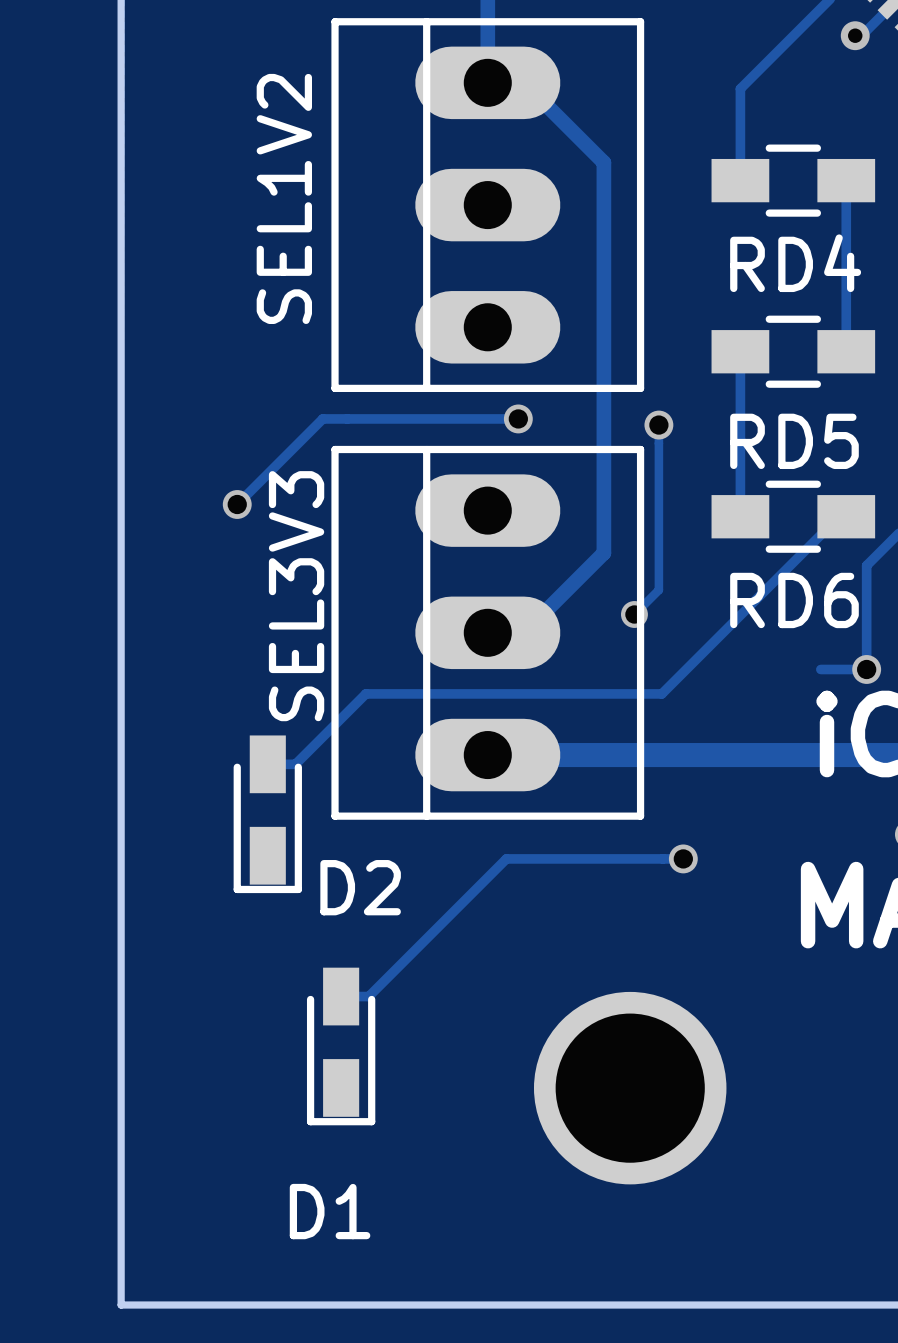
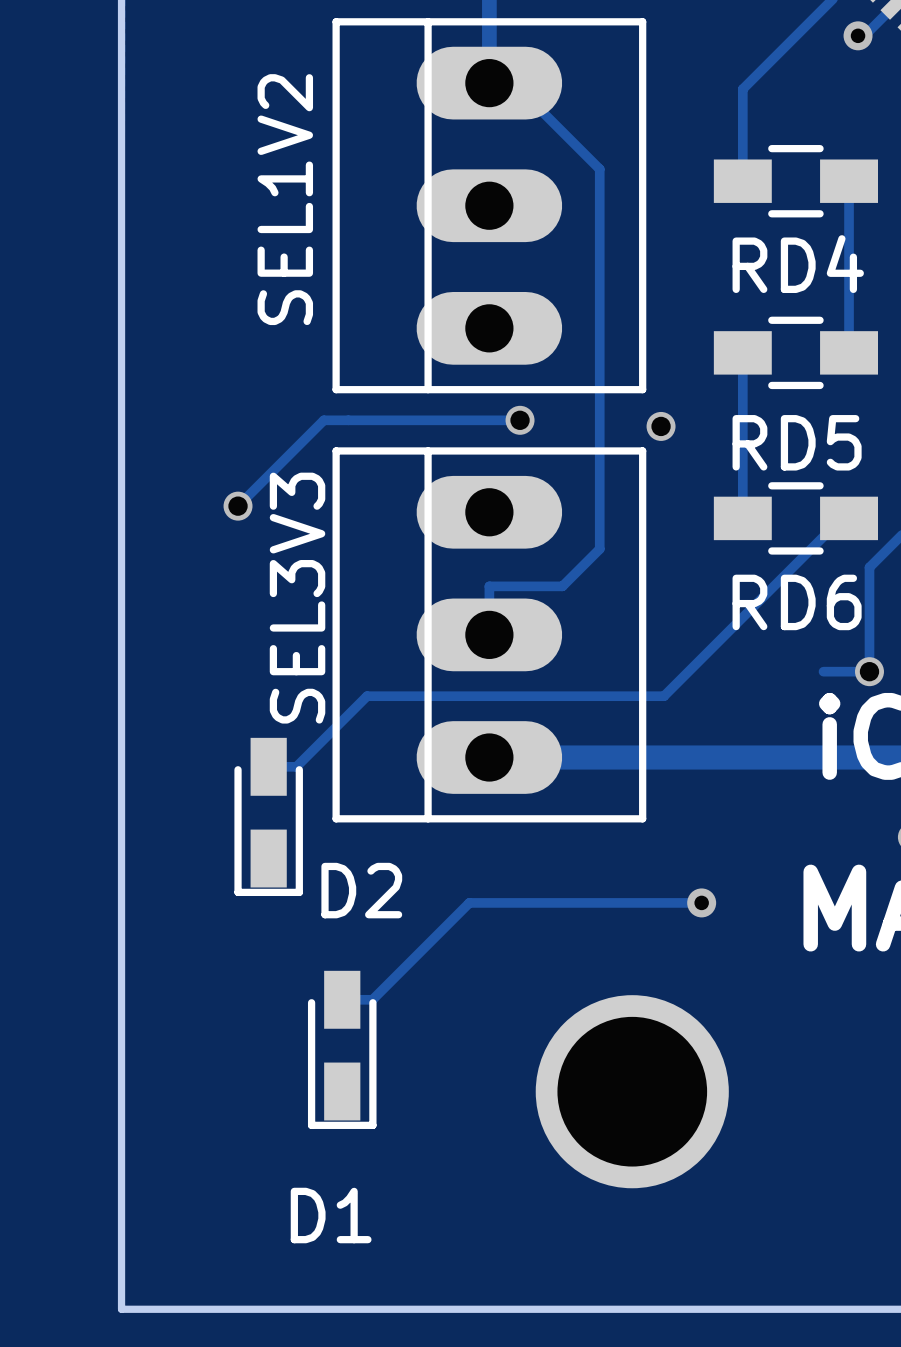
track: (487, 58) (487, 82) (524, 82) (603, 162) (603, 553) (524, 632) (487, 632) (512, 632) -> (489, 58) (599, 169) (599, 549) (562, 586) (489, 586) (489, 634)
track: (658, 425) (658, 590) (634, 614) -> none
via: (634, 614) -> none
track: (683, 858) (506, 858) (368, 996) -> (701, 902) (469, 902) (372, 999) (370, 999)
via: (683, 858) -> none
via: none -> (701, 902)

